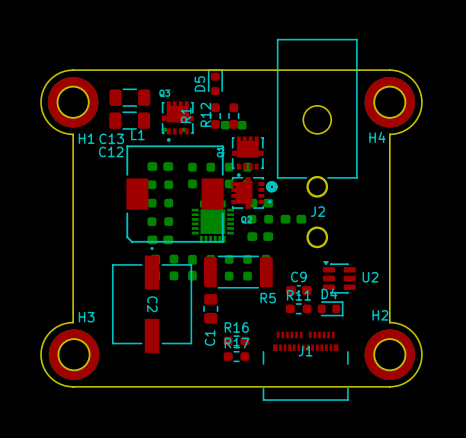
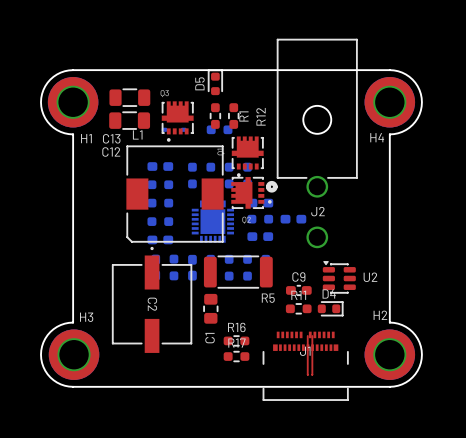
R12 name position: R12 (205, 114) -> R12 (261, 116)
R1 name position: R1 (186, 115) -> R1 (243, 116)
part position: (233, 125) -> (219, 129)
top track: none -> (307, 335) (307, 374)
top track: none -> (312, 335) (312, 374)

